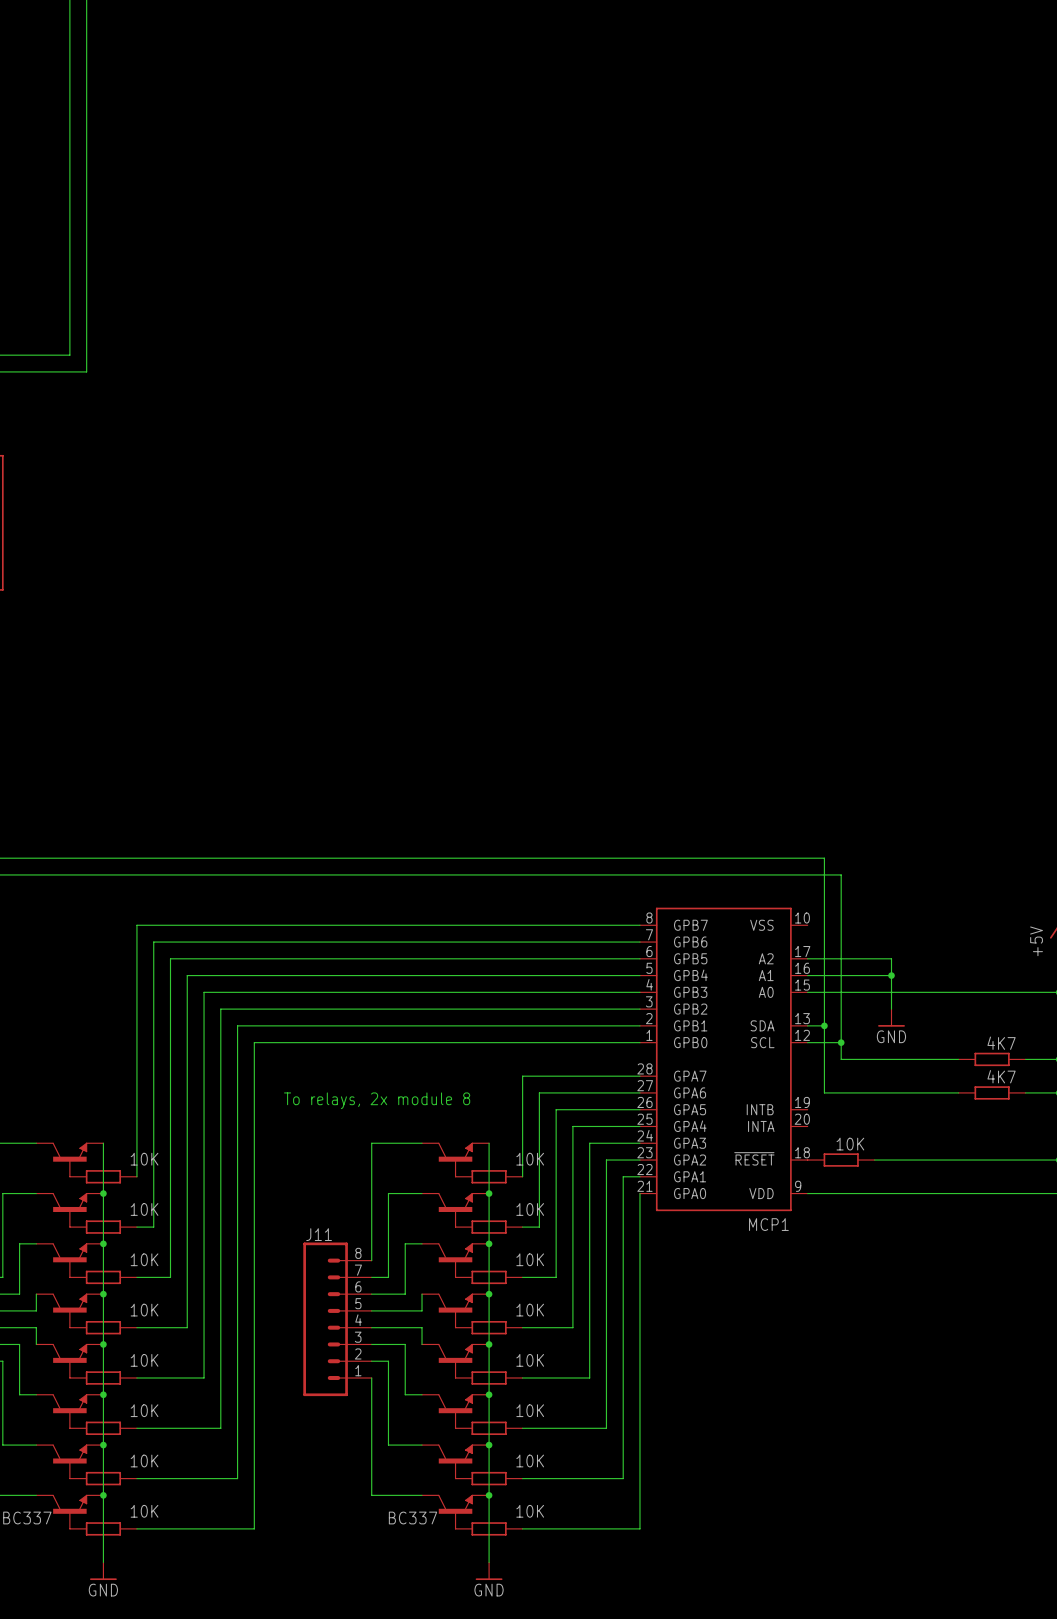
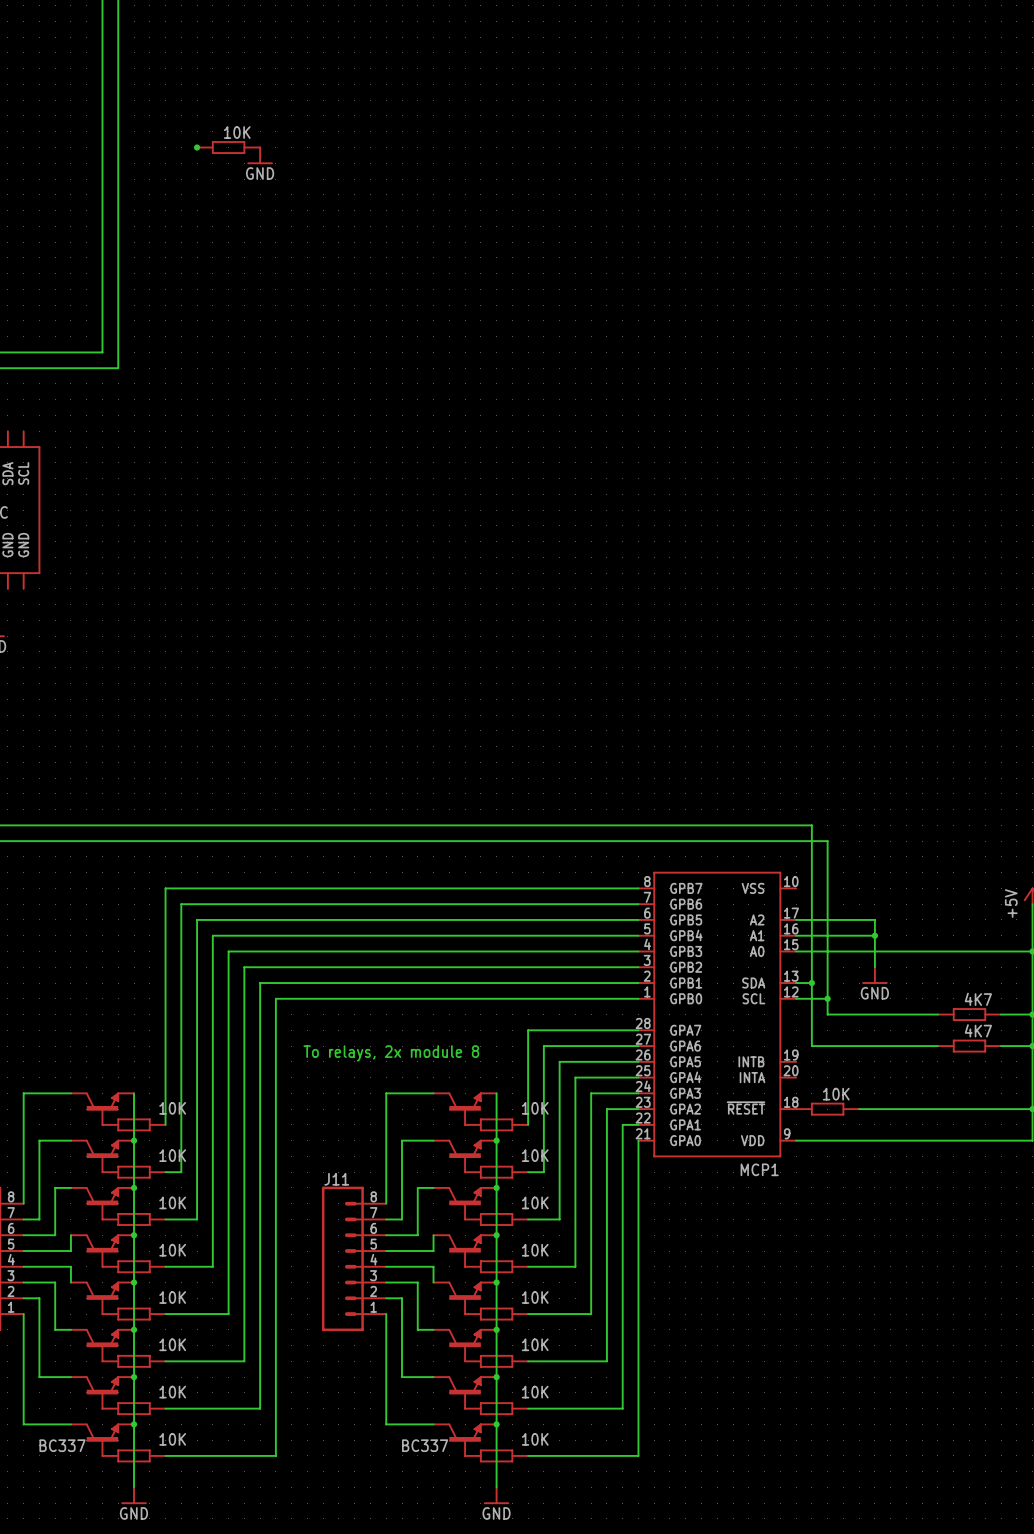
junction: none -> (197, 147)
part: none -> 10K (228, 147)
power symbol: none -> GND (260, 155)

